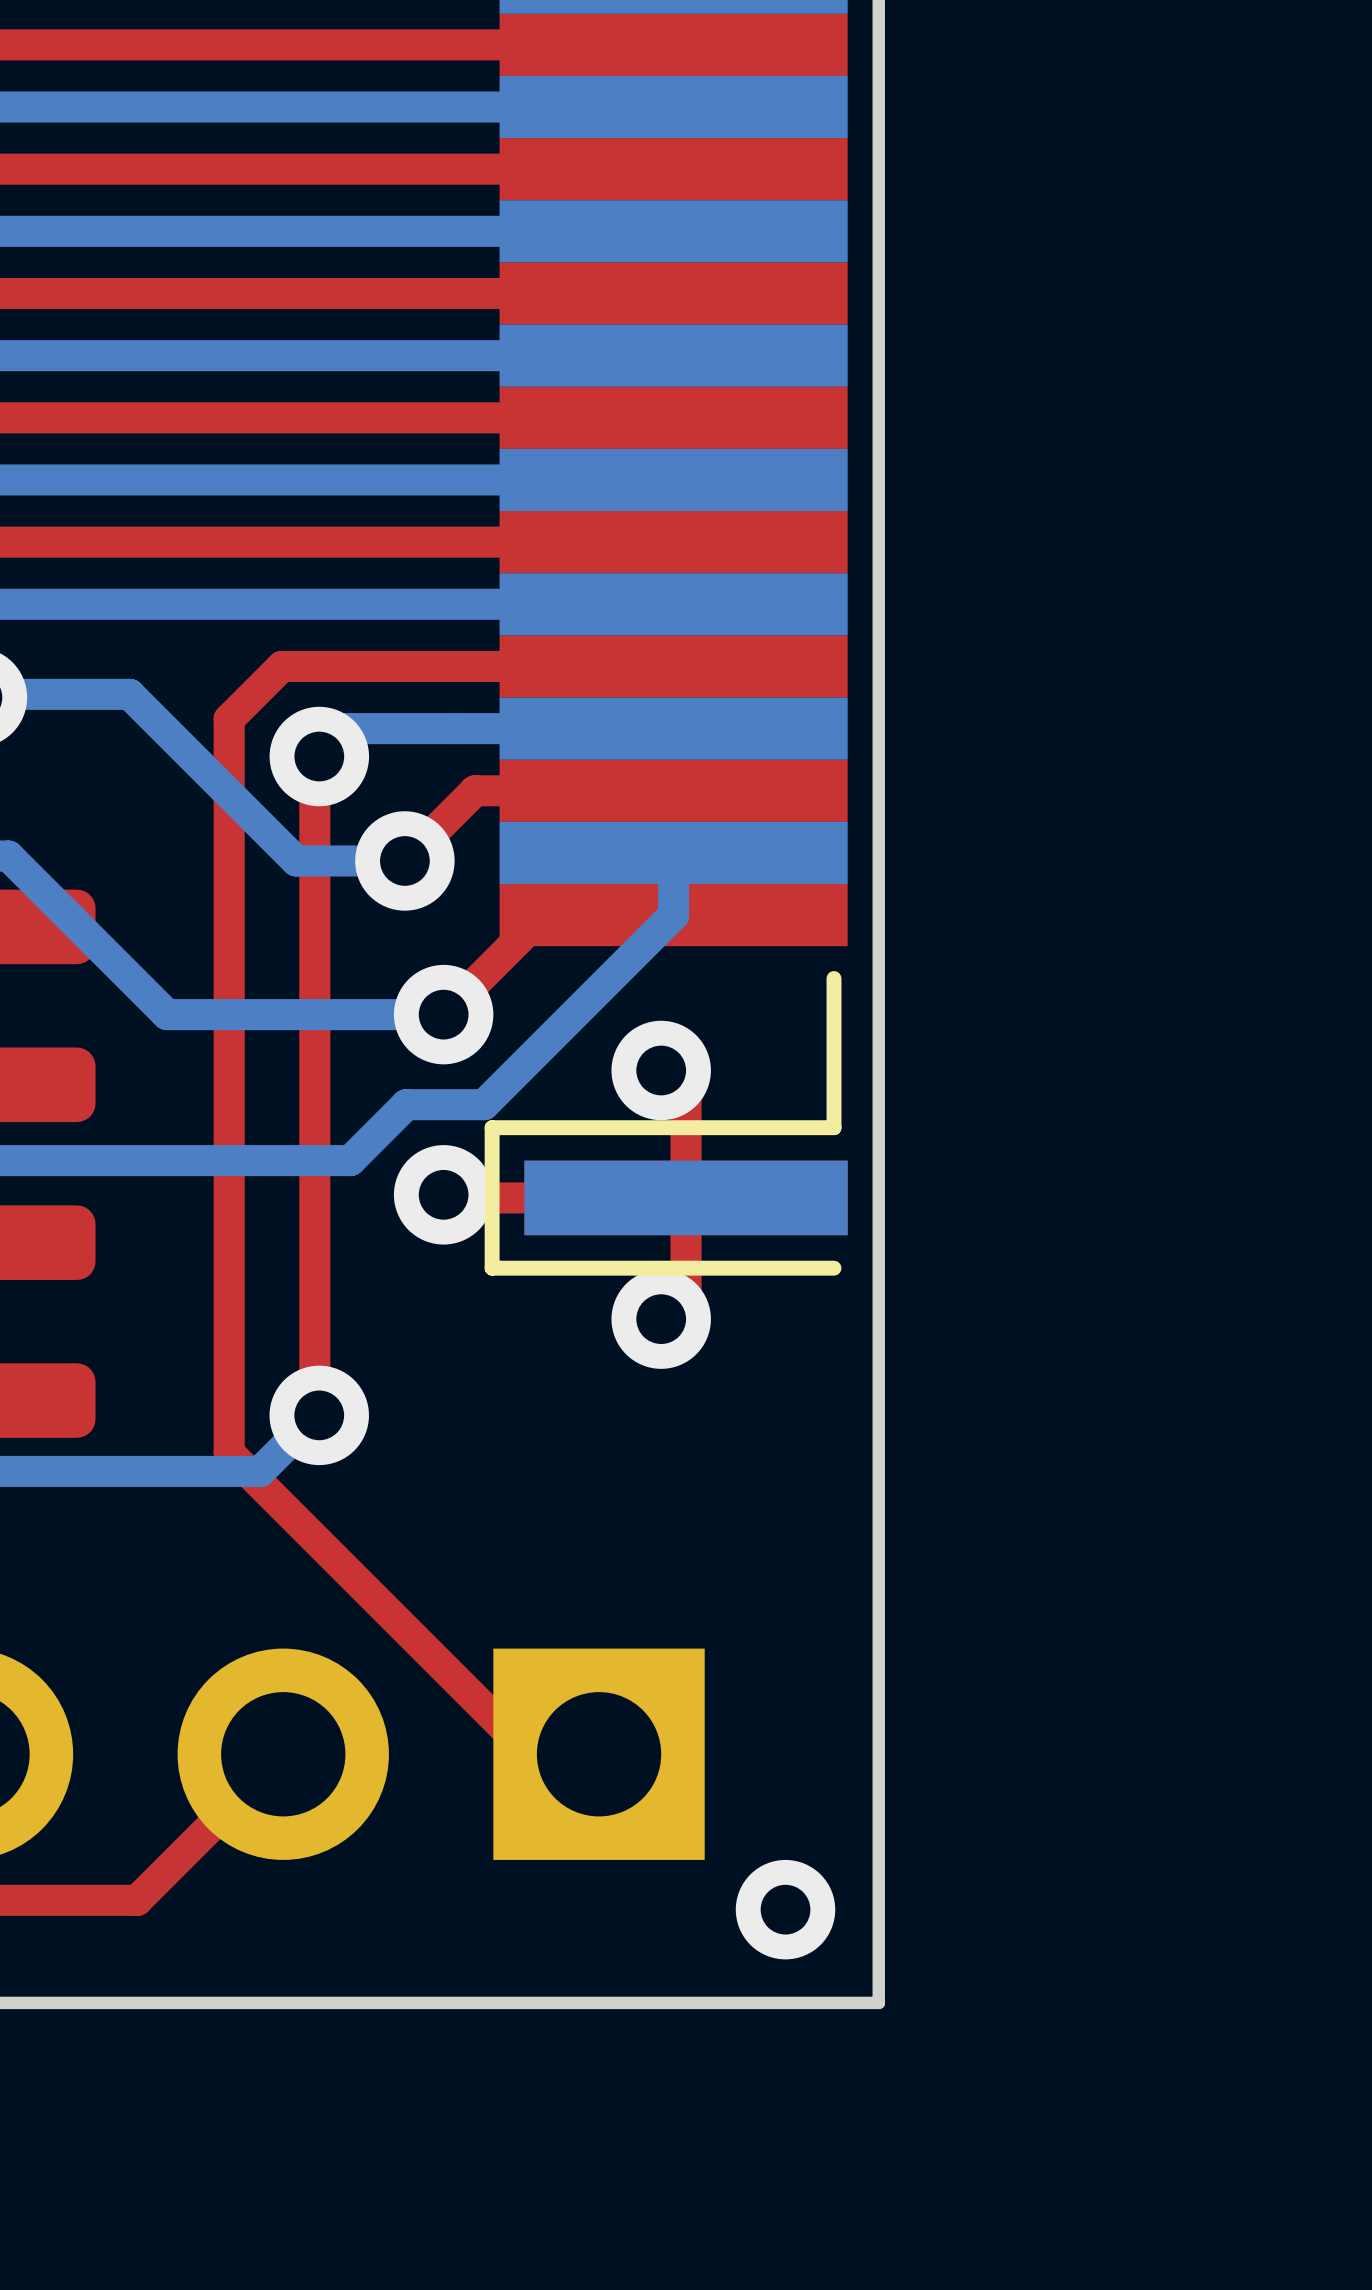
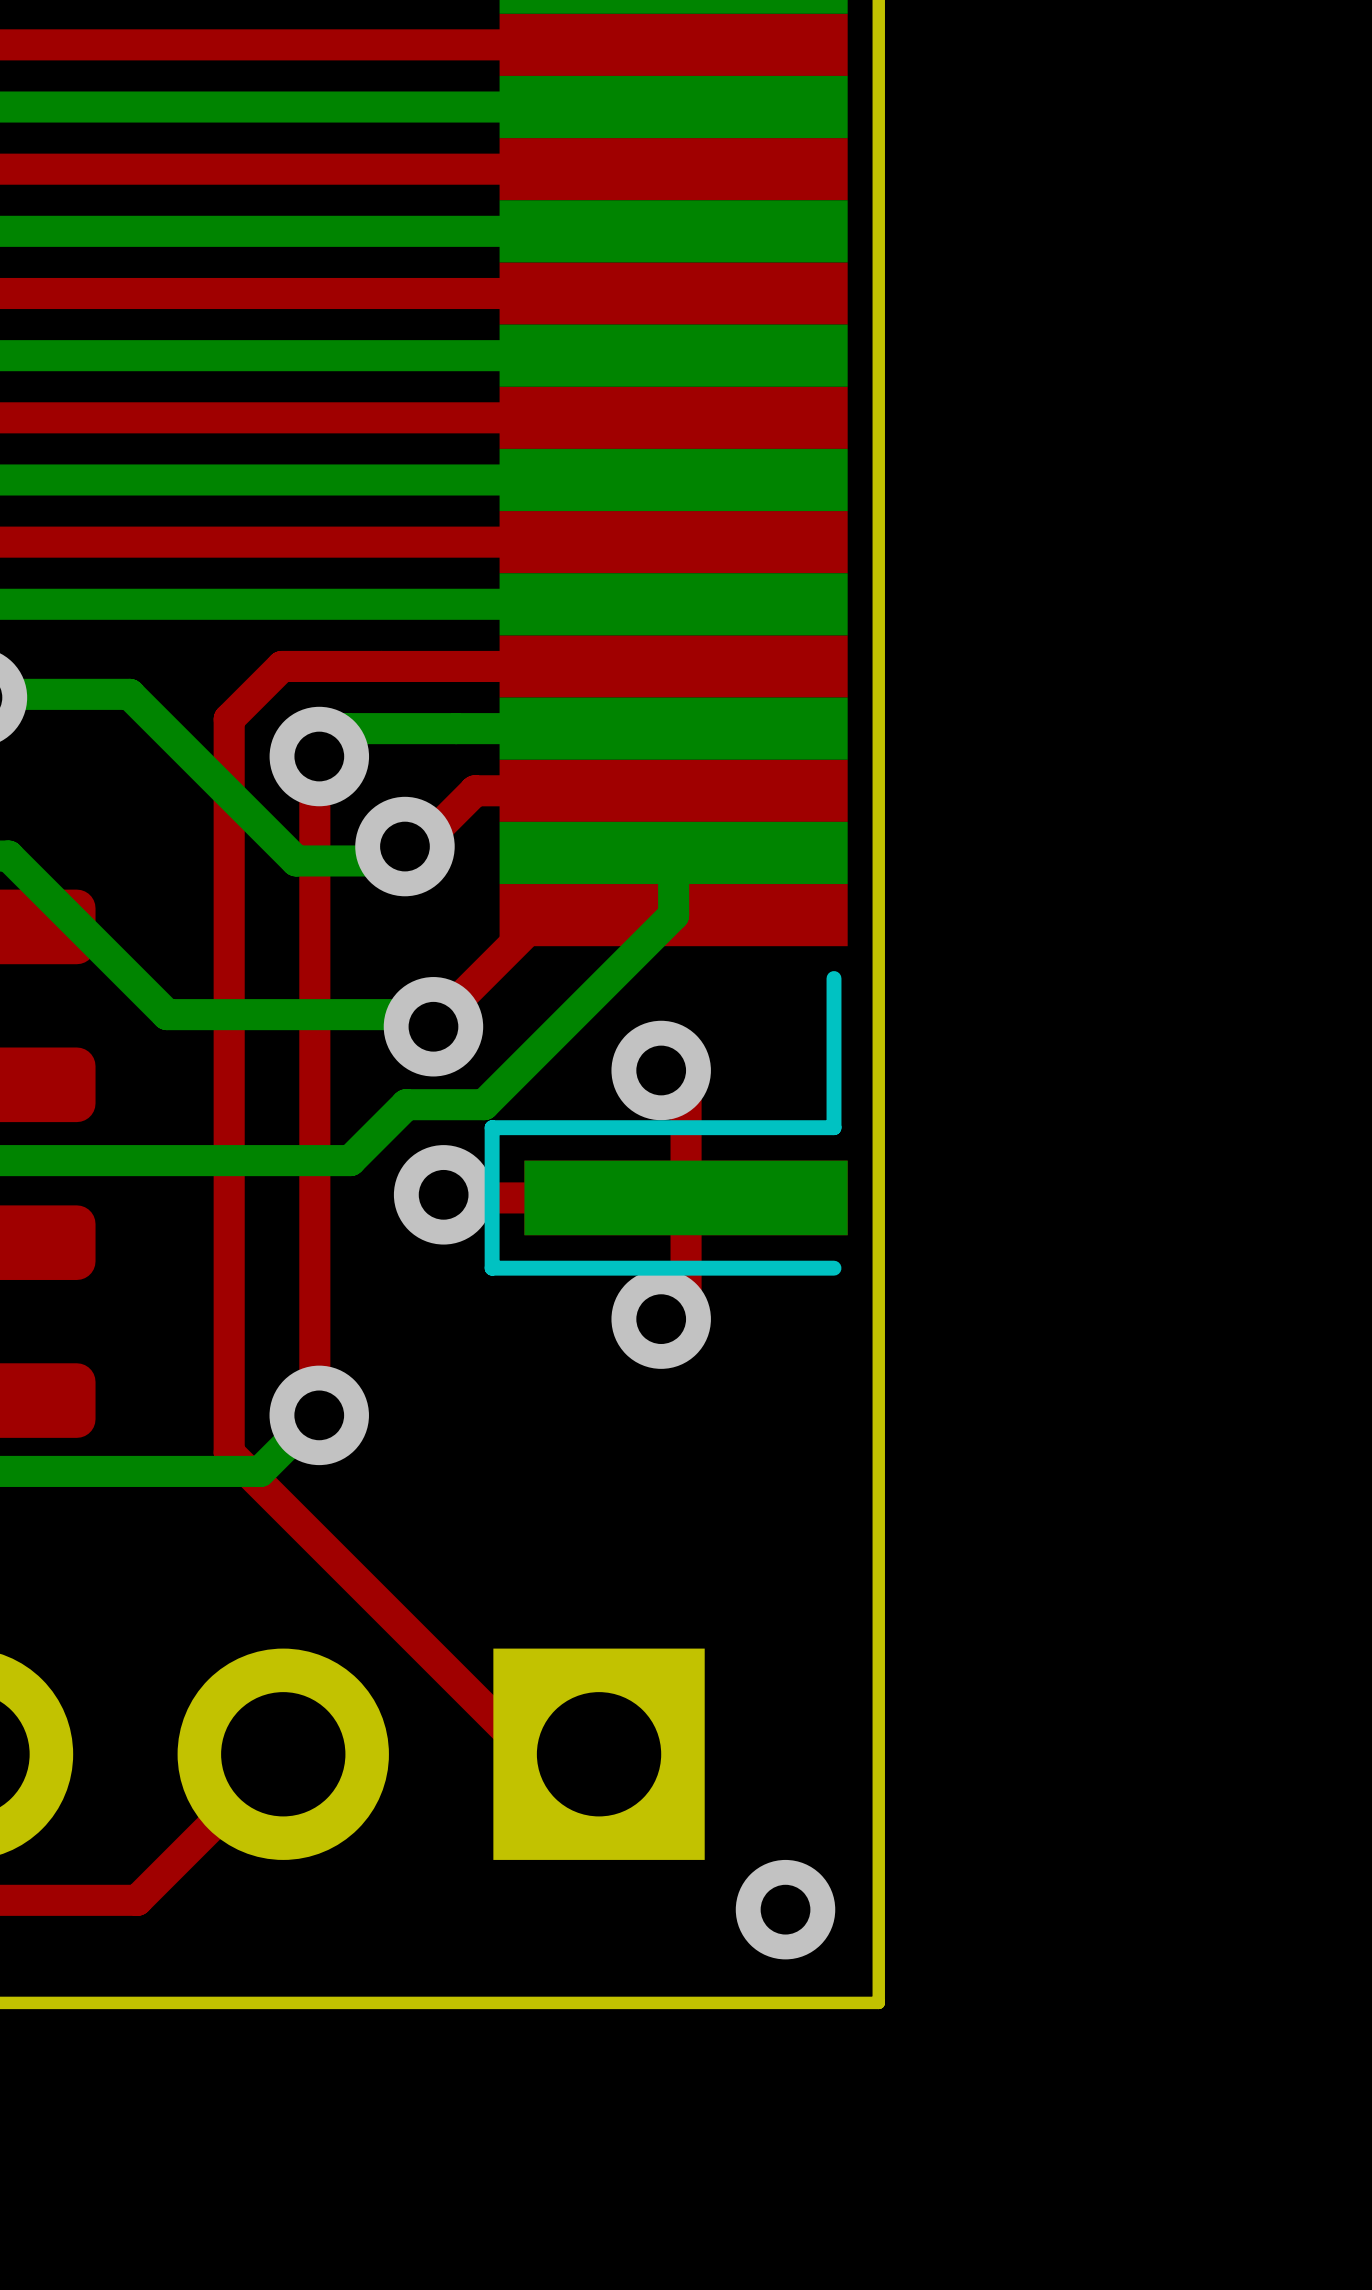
via position: (404, 860) -> (404, 846)
via position: (443, 1014) -> (433, 1026)

